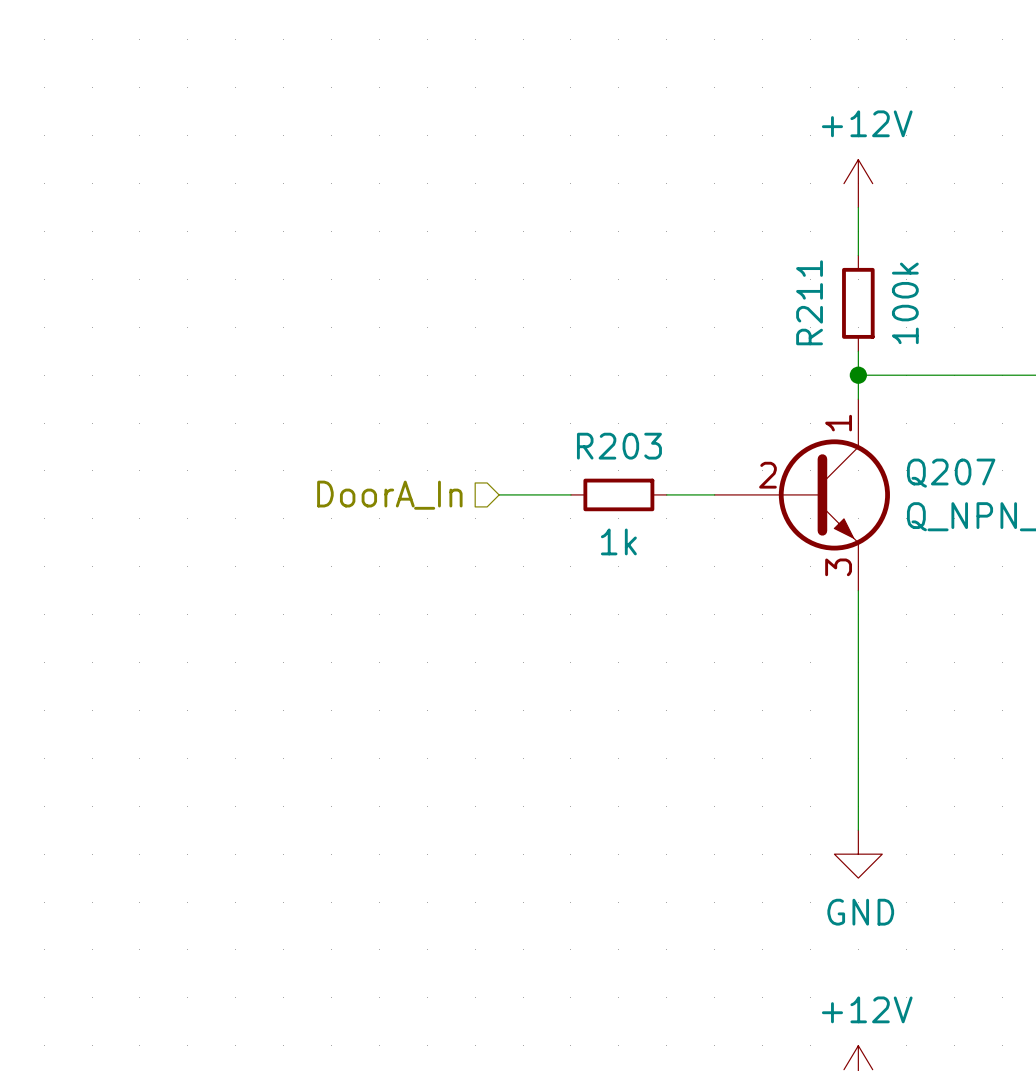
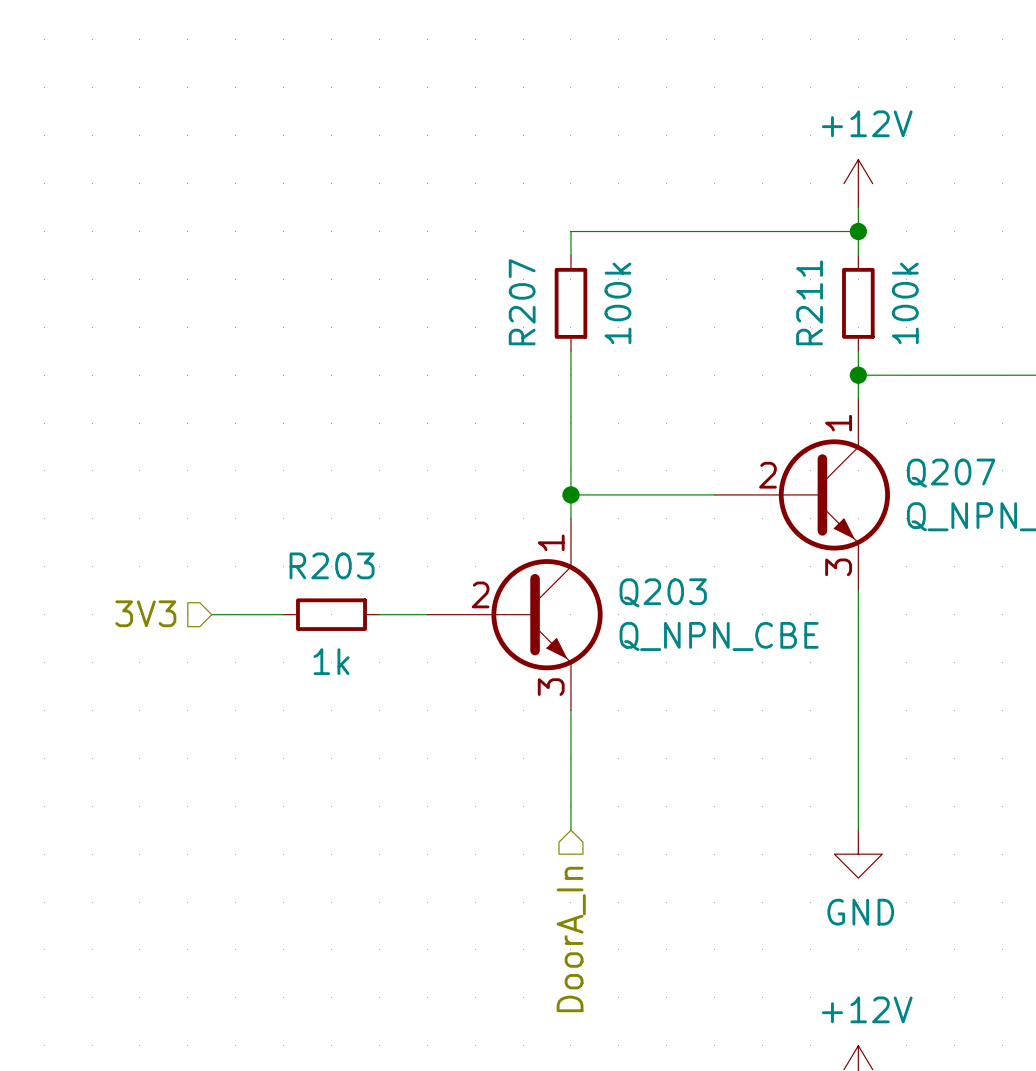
wire: none -> (858, 231) (570, 231) (570, 255)
junction: none -> (858, 231)
R207: none -> 100k (570, 303)
wire: none -> (570, 351) (570, 518)
wire: (499, 494) (570, 494) -> (666, 494) (570, 494)
junction: none -> (570, 494)
R203 position: (618, 494) -> (331, 614)
hierarchical label rotation: 0° (389, 495) -> 90° counterclockwise (571, 939)
hierarchical label position: DoorA_In (389, 495) -> DoorA_In (571, 939)
hierarchical label: none -> 3V3 (145, 613)
wire: none -> (211, 614) (283, 614)
wire: none -> (379, 614) (427, 614)
Q203: none -> Q_NPN_CBE (514, 614)
wire: none -> (570, 710) (570, 830)

